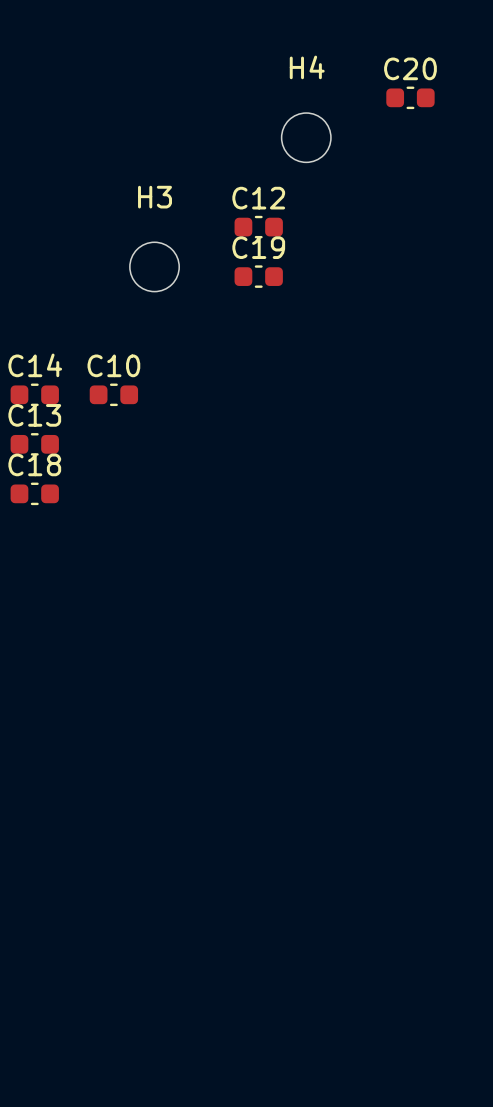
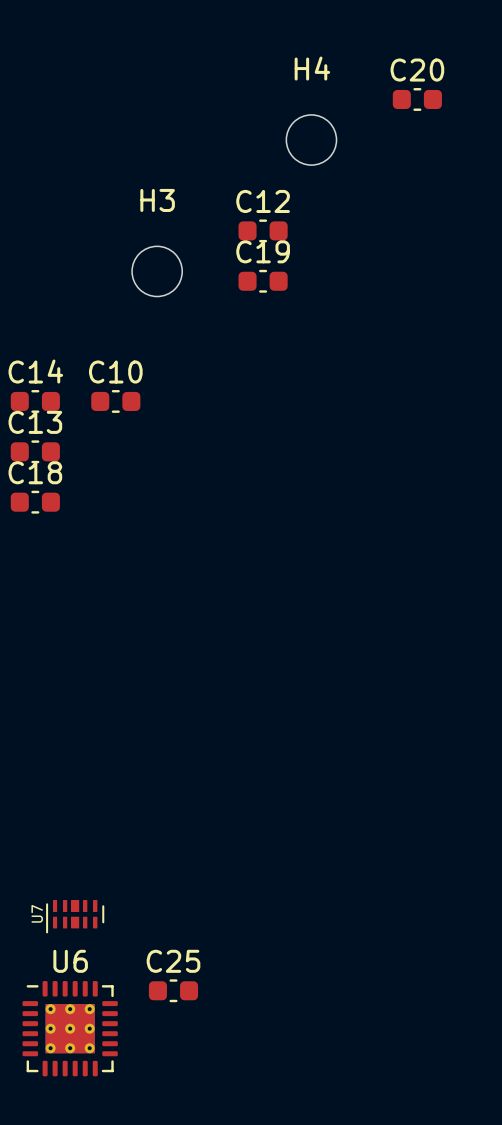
U7: none -> (75, 916)
C25: none -> (173, 990)
U6: none -> (70, 1028)

